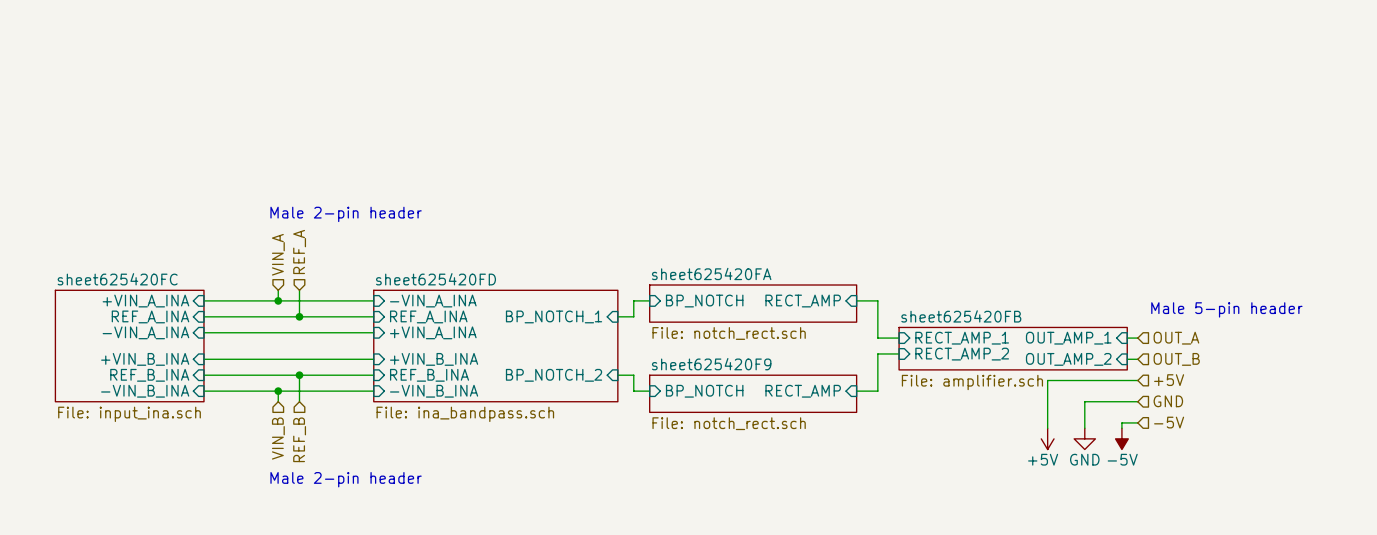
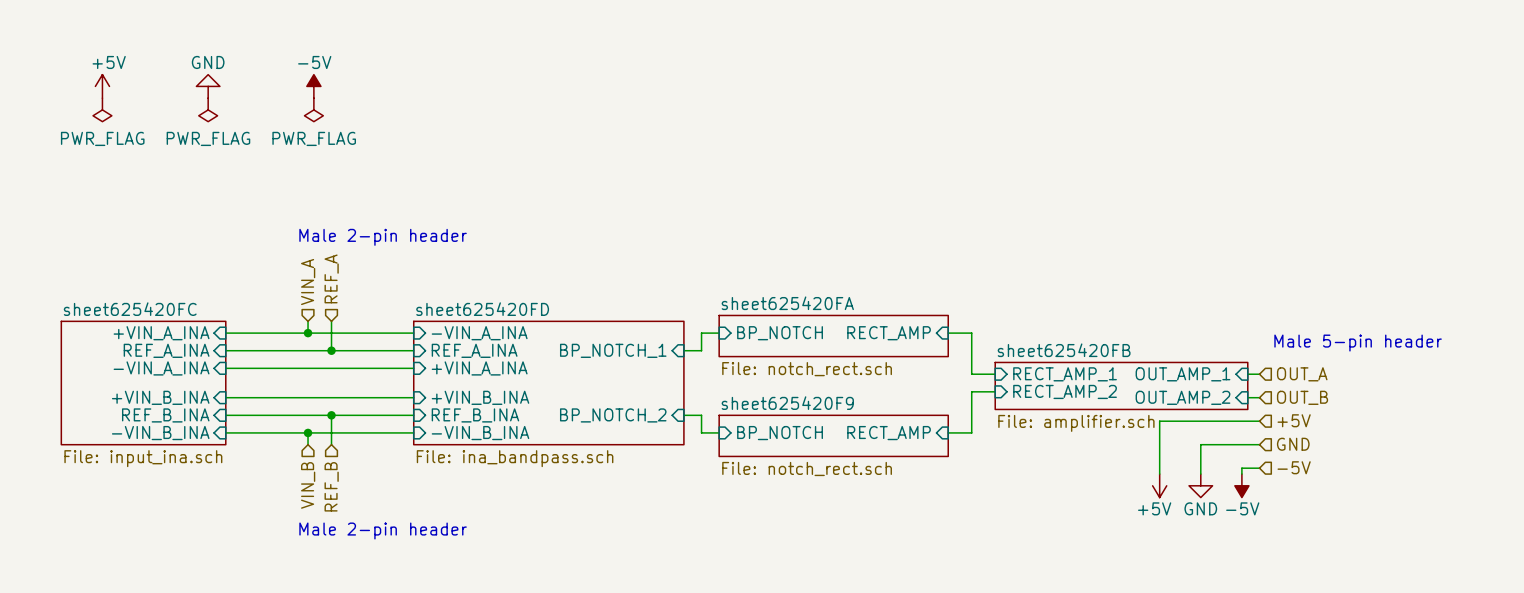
power symbol: none -> +5V (102, 86)
power symbol: none -> GND (208, 86)
power symbol: none -> -5V (313, 86)
power symbol: none -> PWR_FLAG (102, 109)
power symbol: none -> PWR_FLAG (208, 109)
power symbol: none -> PWR_FLAG (313, 109)

